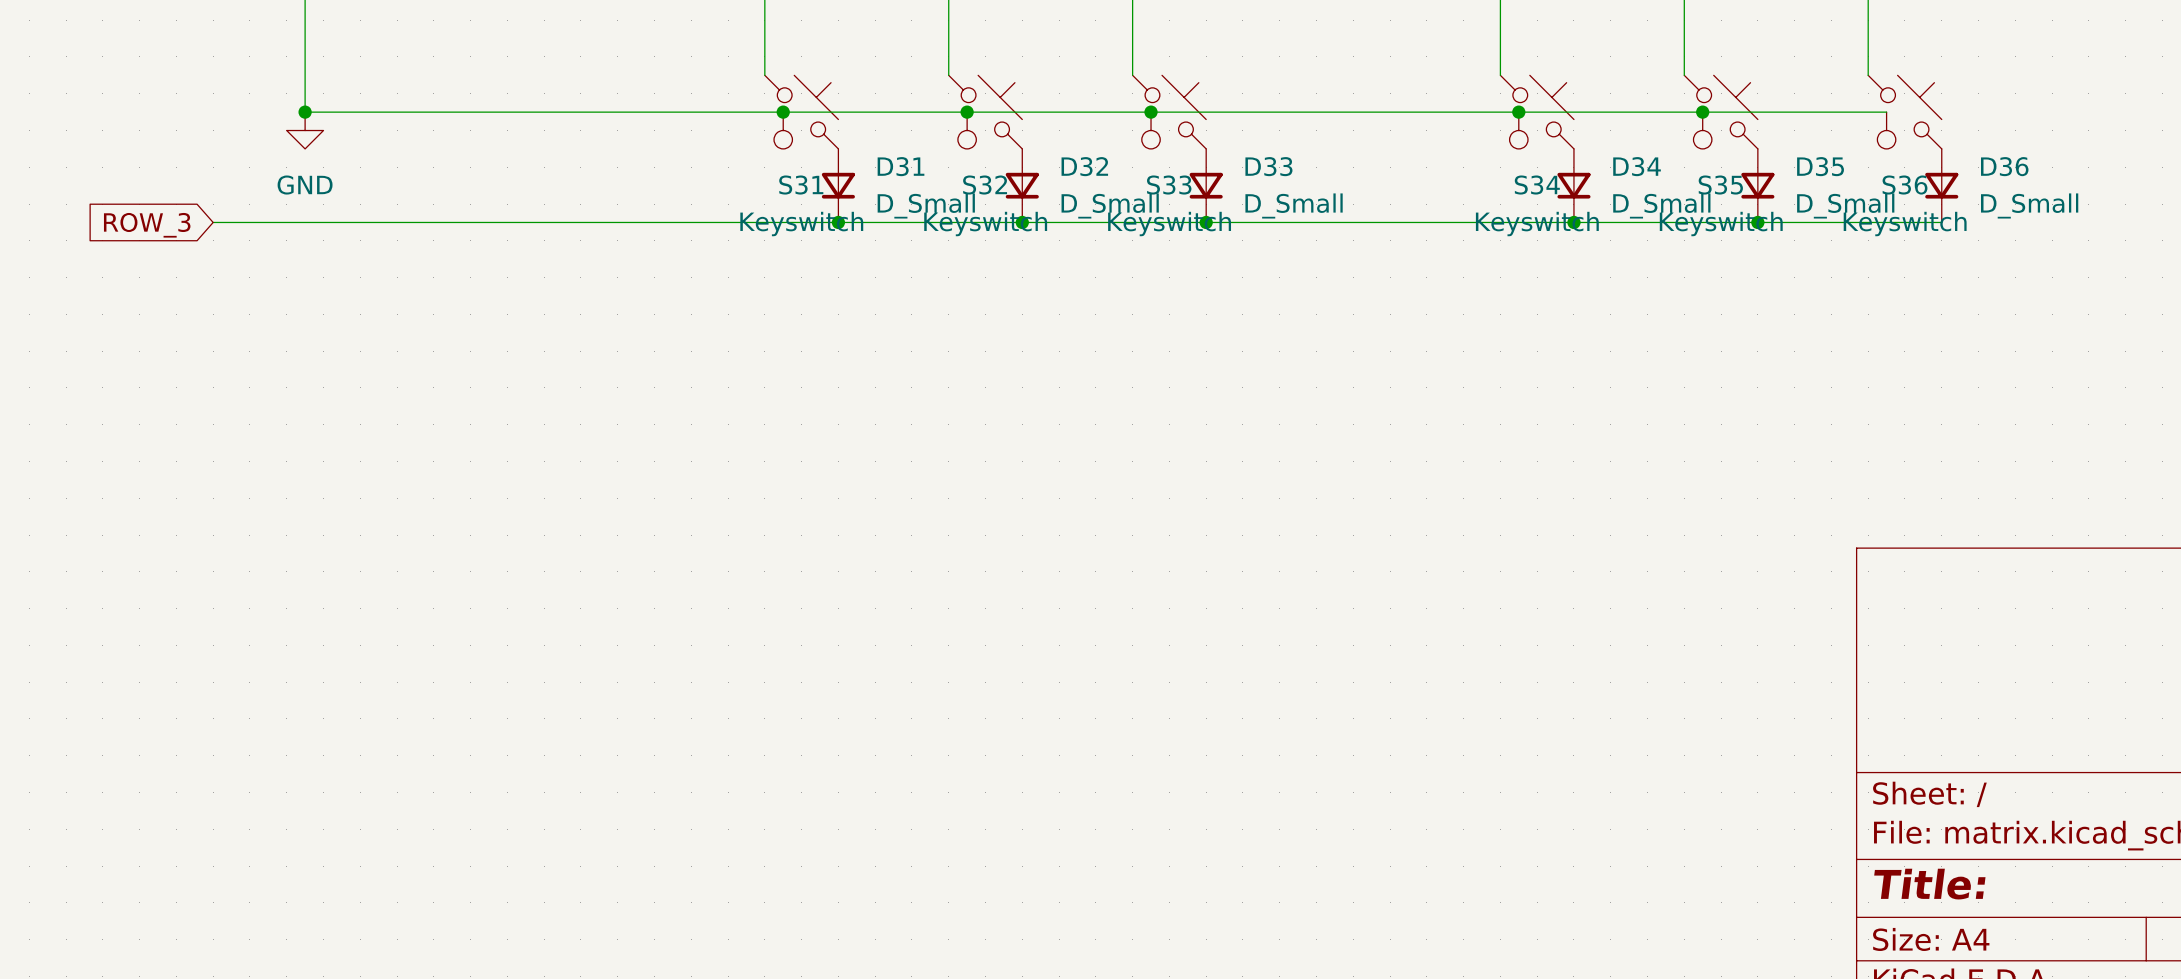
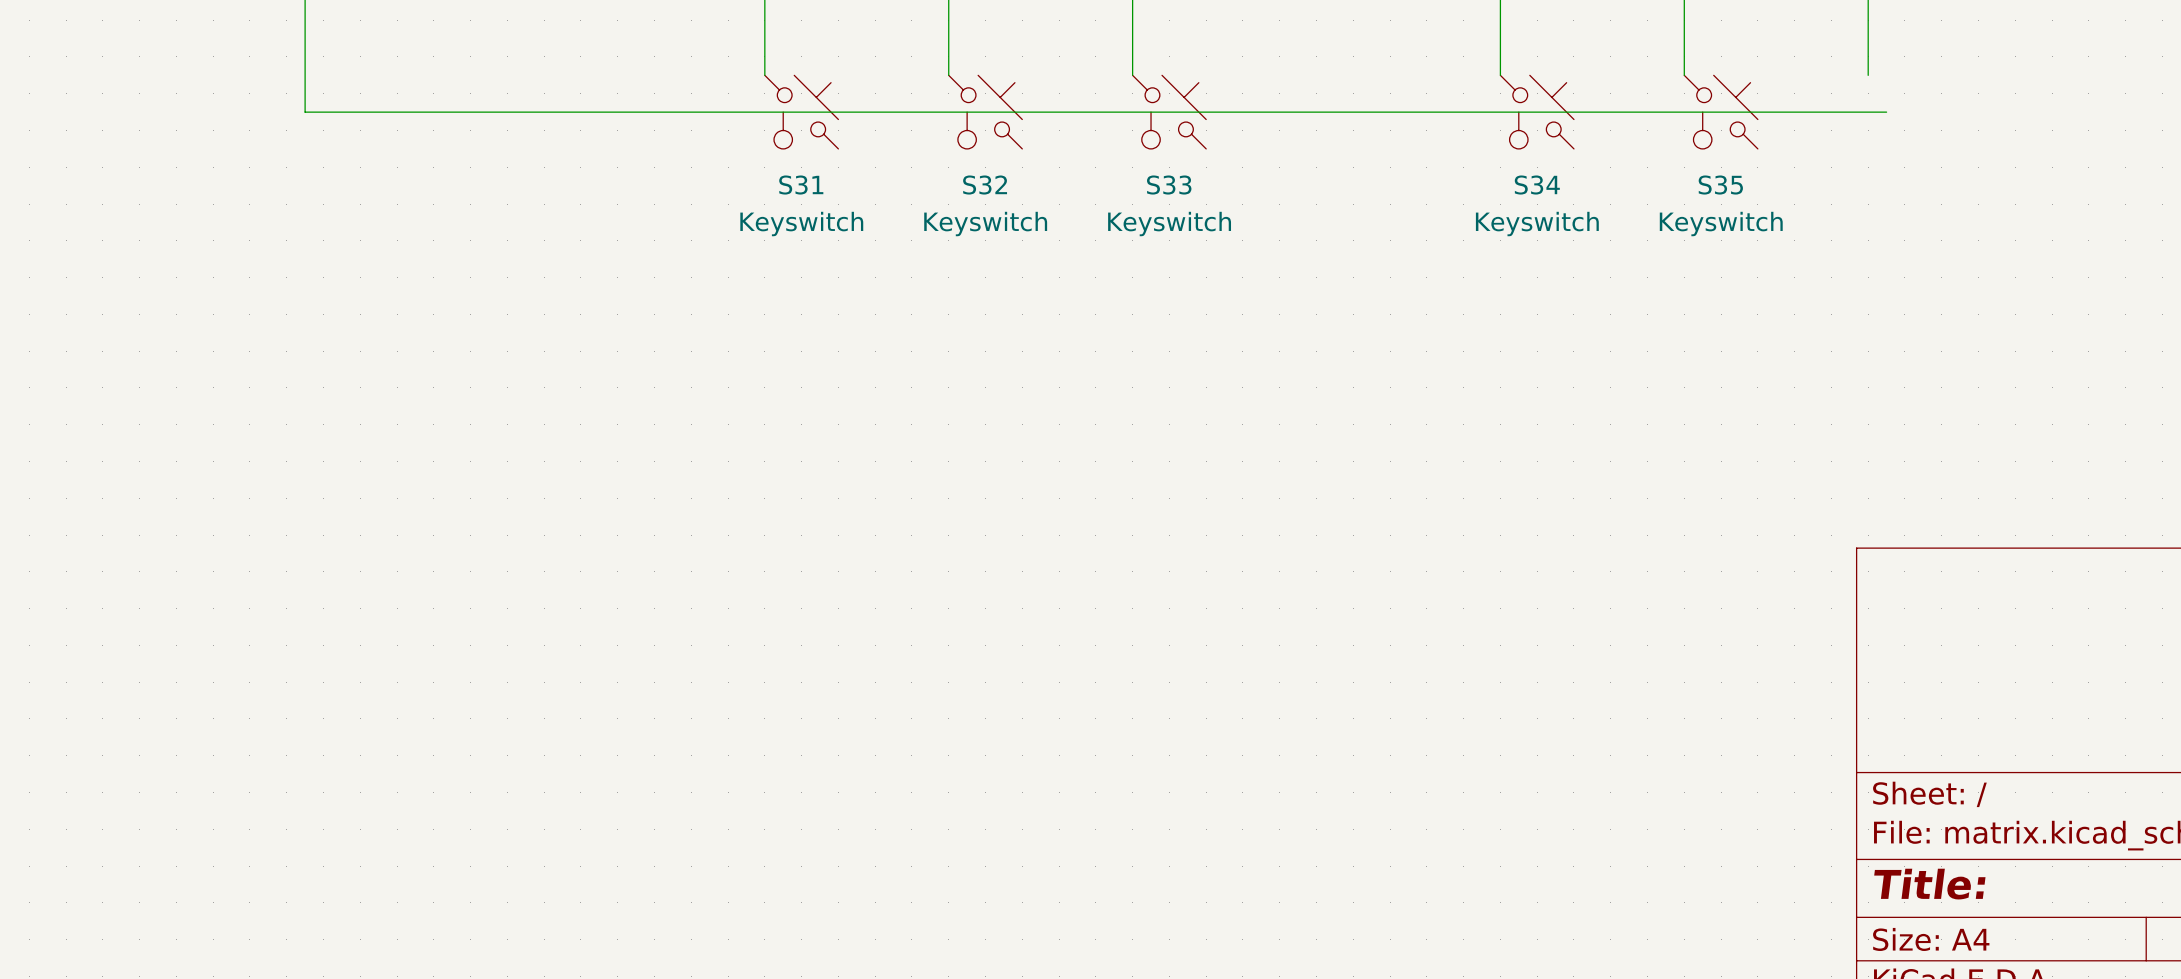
junction: (305, 112) -> none
junction: (783, 112) -> none
junction: (967, 112) -> none
junction: (1151, 112) -> none
junction: (1518, 112) -> none
junction: (1702, 112) -> none
S36: Keyswitch (1904, 112) -> none
power symbol: GND (305, 130) -> none
D31: D_Small (838, 185) -> none
D32: D_Small (1022, 185) -> none
D33: D_Small (1206, 185) -> none
D34: D_Small (1573, 185) -> none
D35: D_Small (1757, 185) -> none
D36: D_Small (1941, 185) -> none
wire: (213, 222) (1941, 222) -> none
junction: (838, 222) -> none
junction: (1022, 222) -> none
junction: (1206, 222) -> none
junction: (1573, 222) -> none
junction: (1757, 222) -> none
global label: ROW_3 (147, 225) -> none

